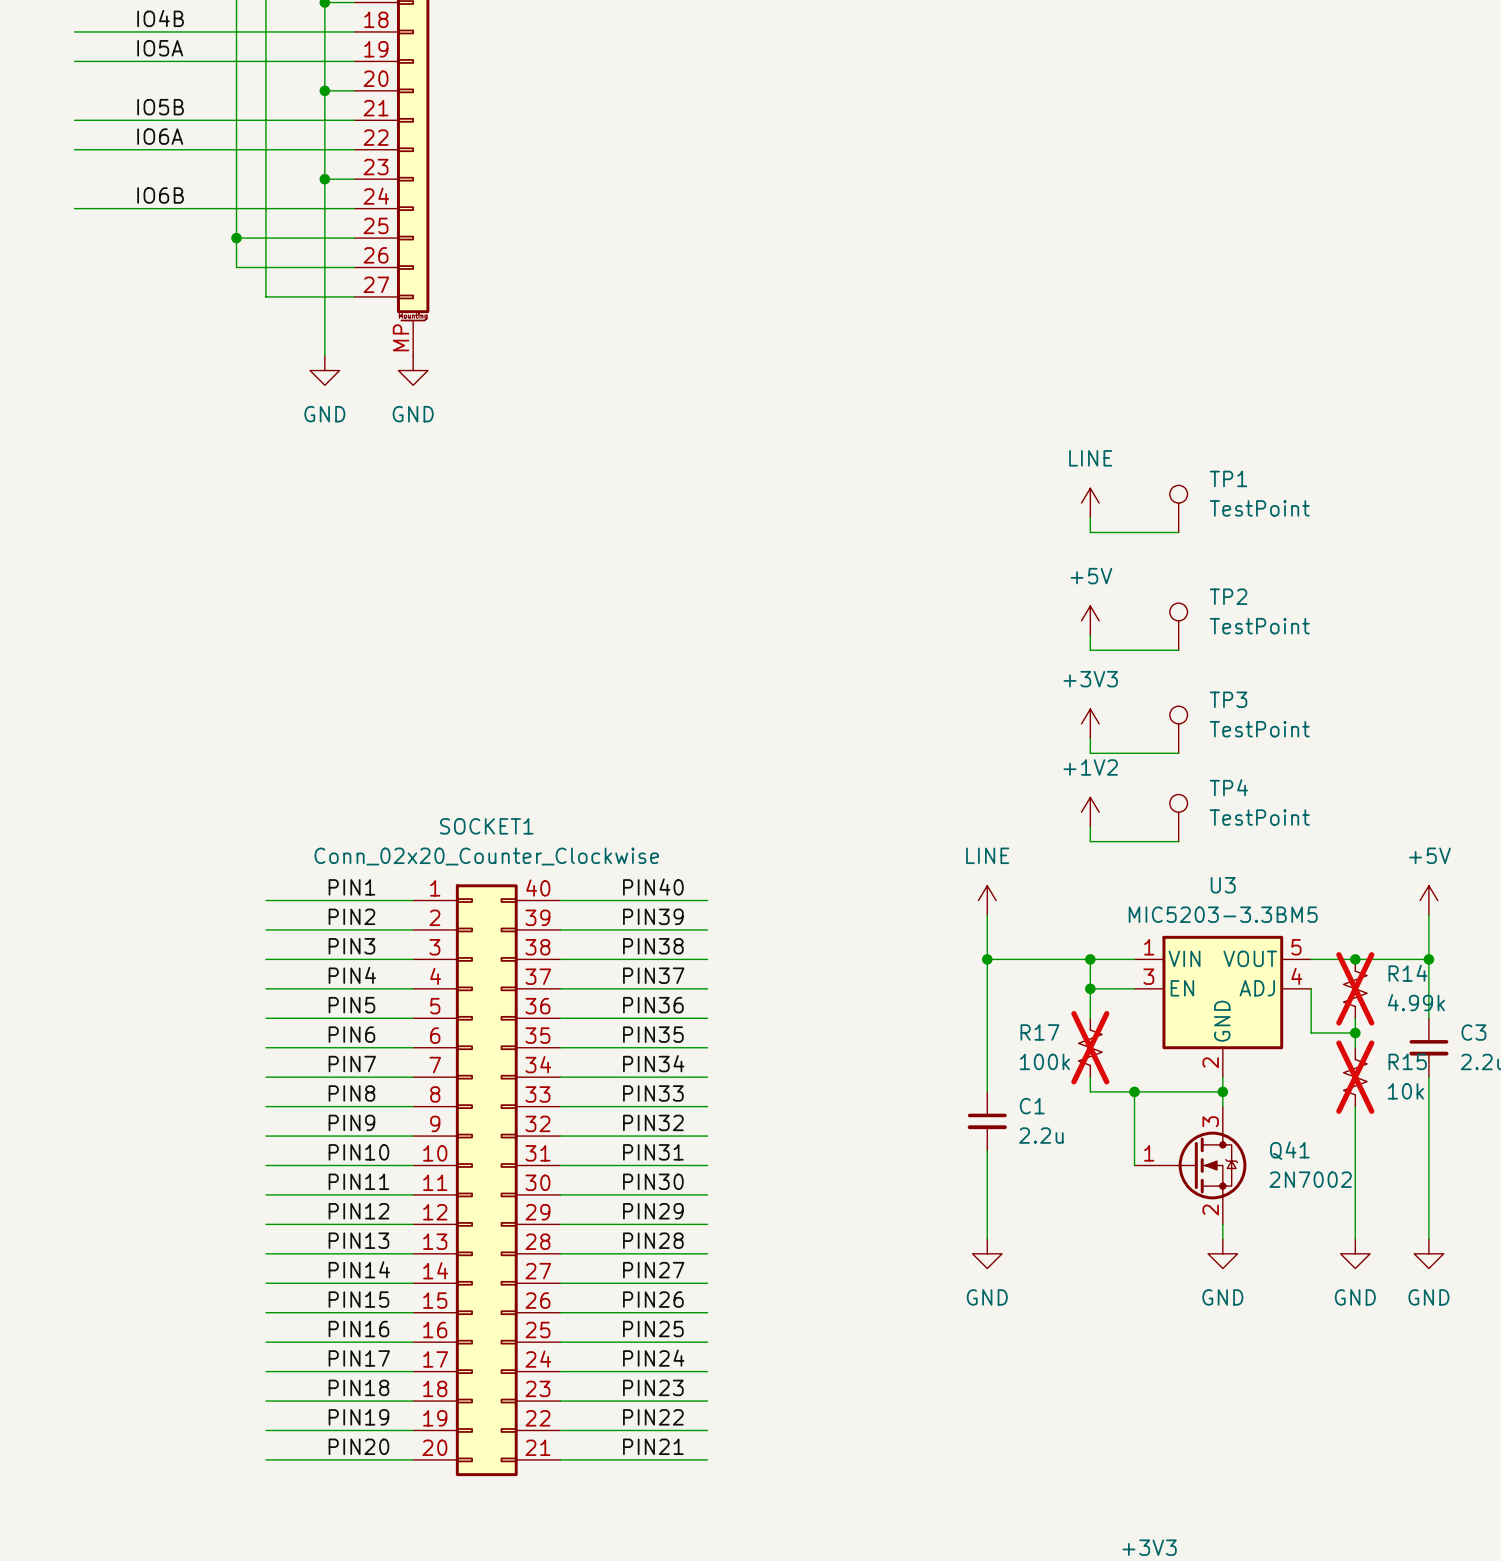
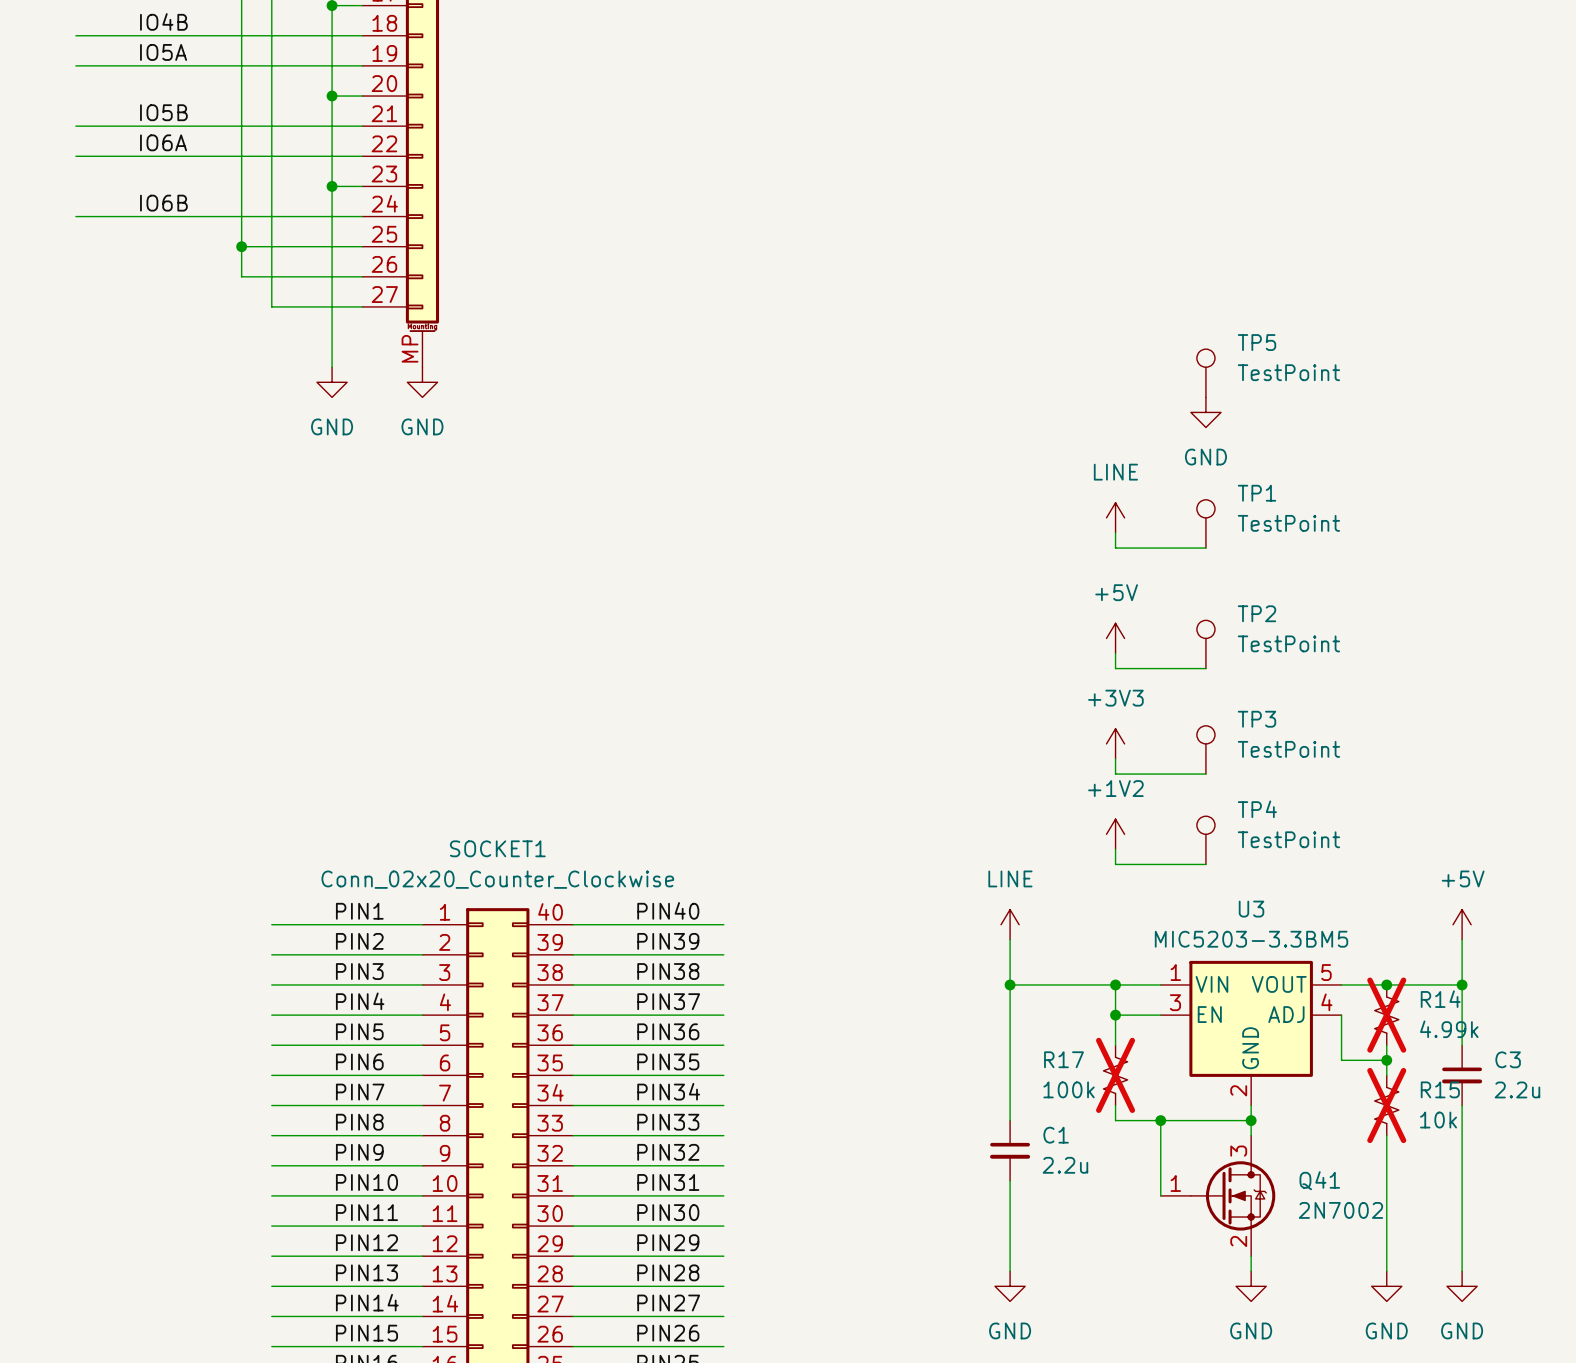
TP5: none -> TestPoint (1205, 373)
power symbol: none -> GND (1205, 412)

